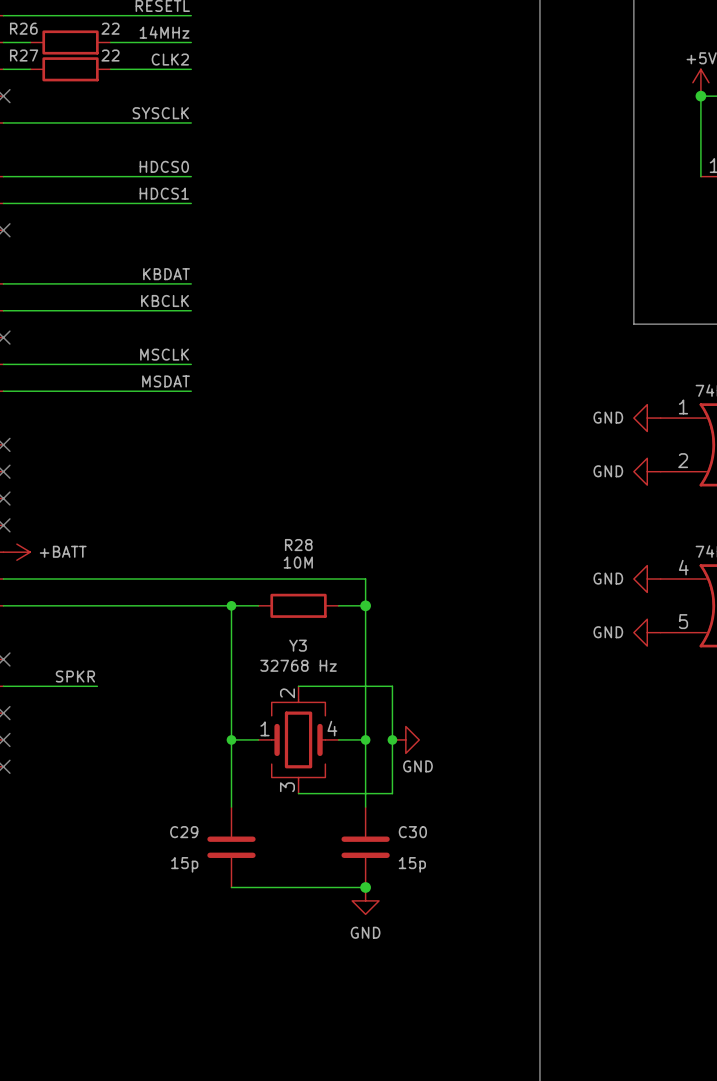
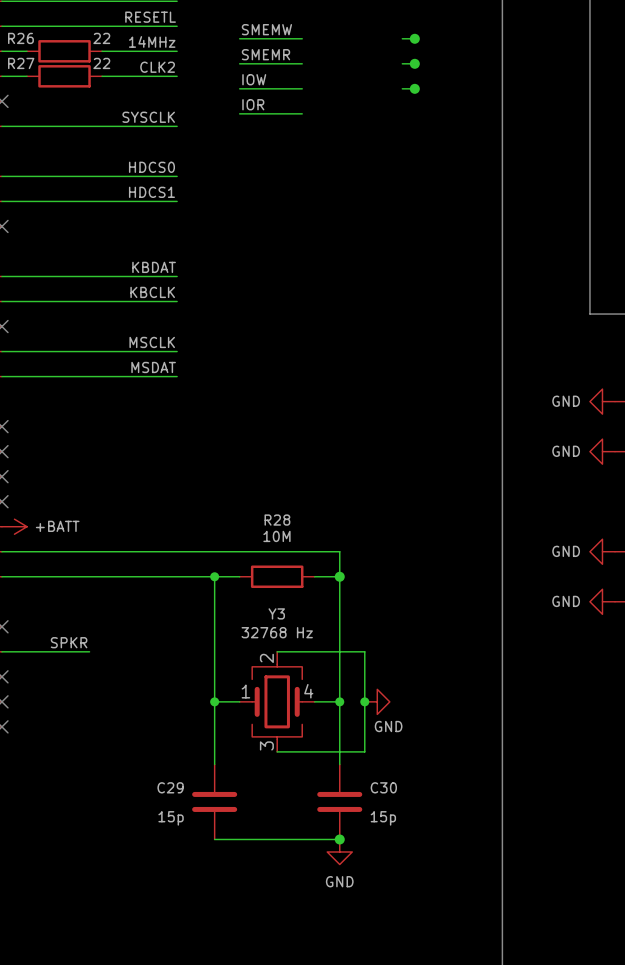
label: none -> SMEMW (266, 29)
wire: none -> (239, 38) (302, 38)
wire: none -> (402, 38) (414, 38)
junction: none -> (414, 38)
label: none -> SMEMR (265, 54)
wire: none -> (239, 63) (302, 63)
wire: none -> (402, 63) (414, 63)
junction: none -> (414, 63)
label: none -> IOW (254, 79)
wire: none -> (239, 88) (302, 88)
wire: none -> (402, 88) (414, 88)
junction: none -> (414, 88)
label: none -> IOR (253, 104)
wire: none -> (239, 113) (302, 113)

